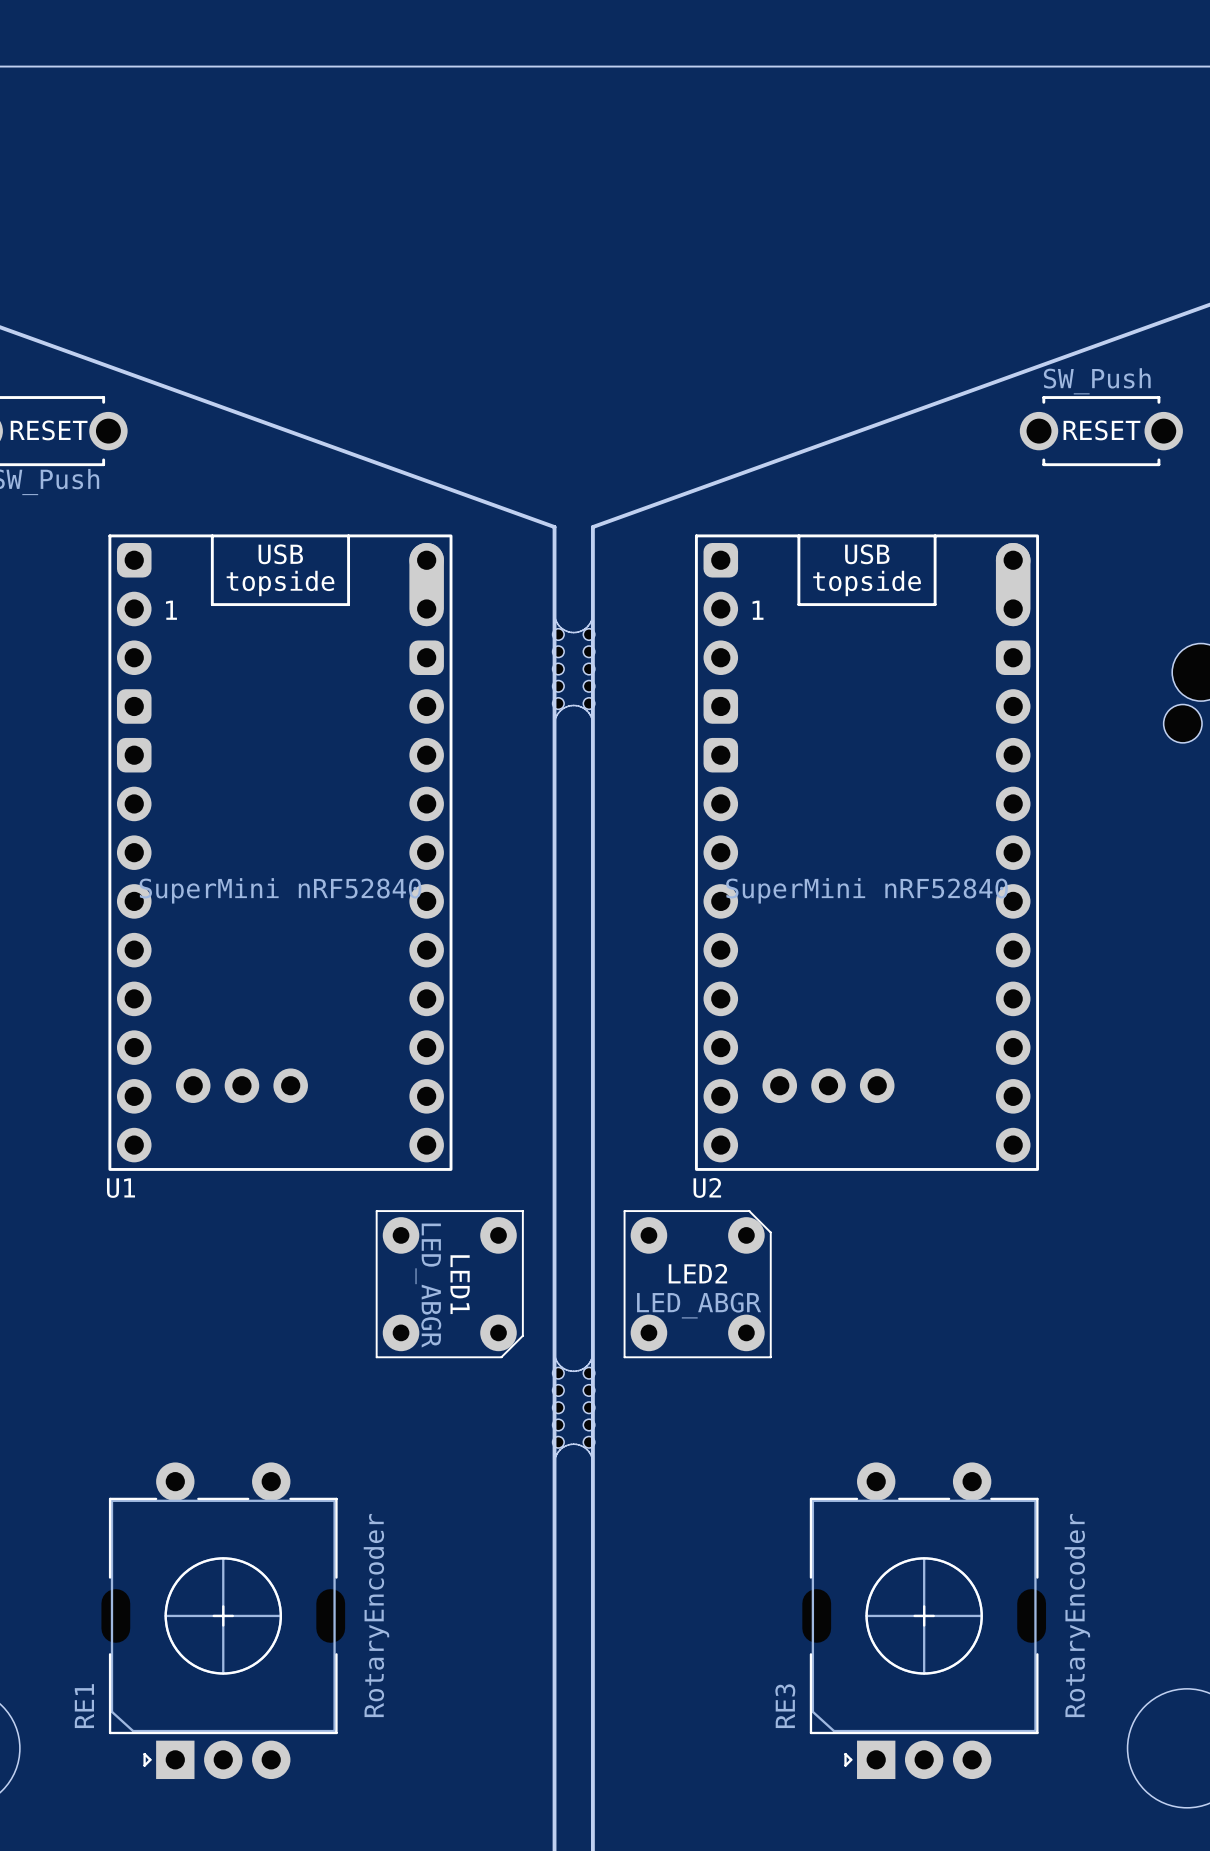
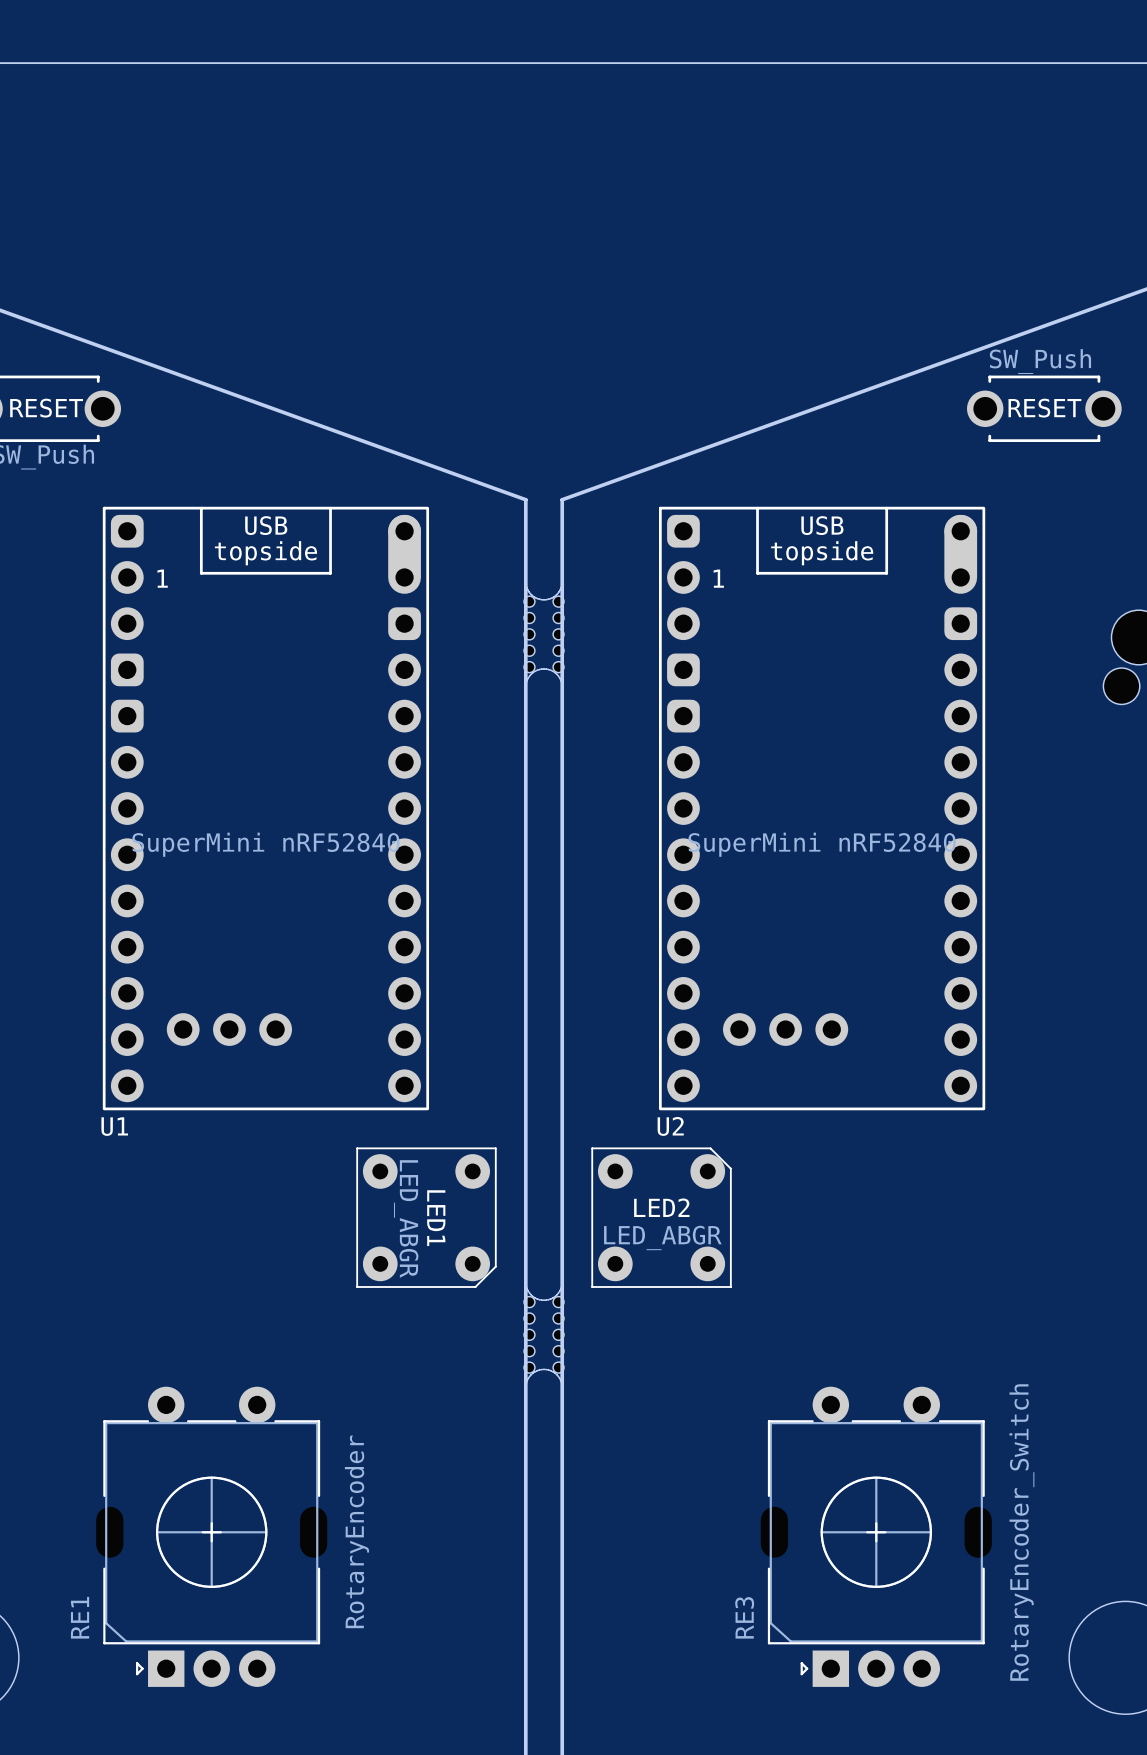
RE3 value: RotaryEncoder (1077, 1615) -> RotaryEncoder_Switch (1021, 1532)

